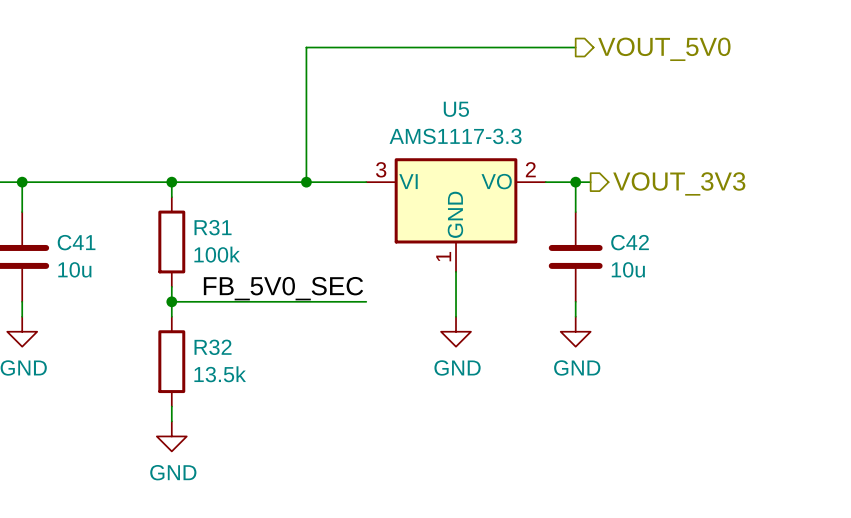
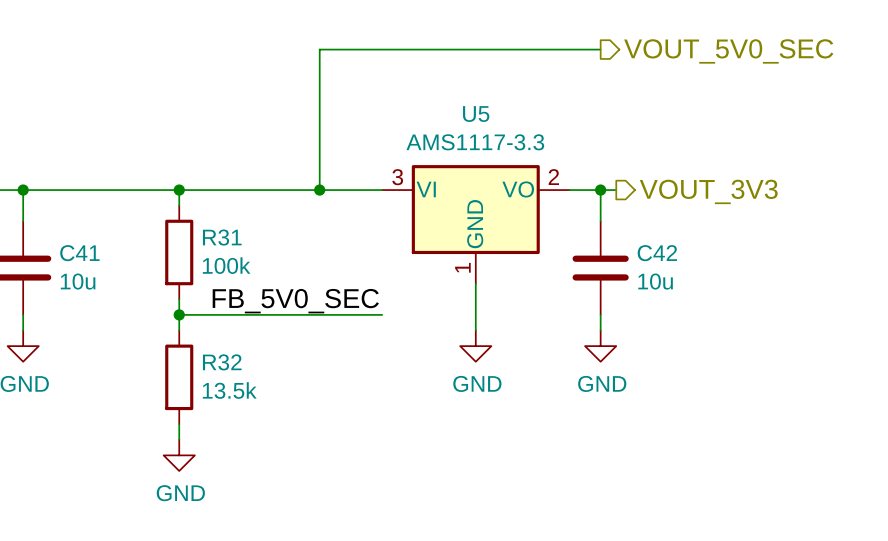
hierarchical label: VOUT_5V0 (664, 49) -> VOUT_5V0_SEC (728, 51)

